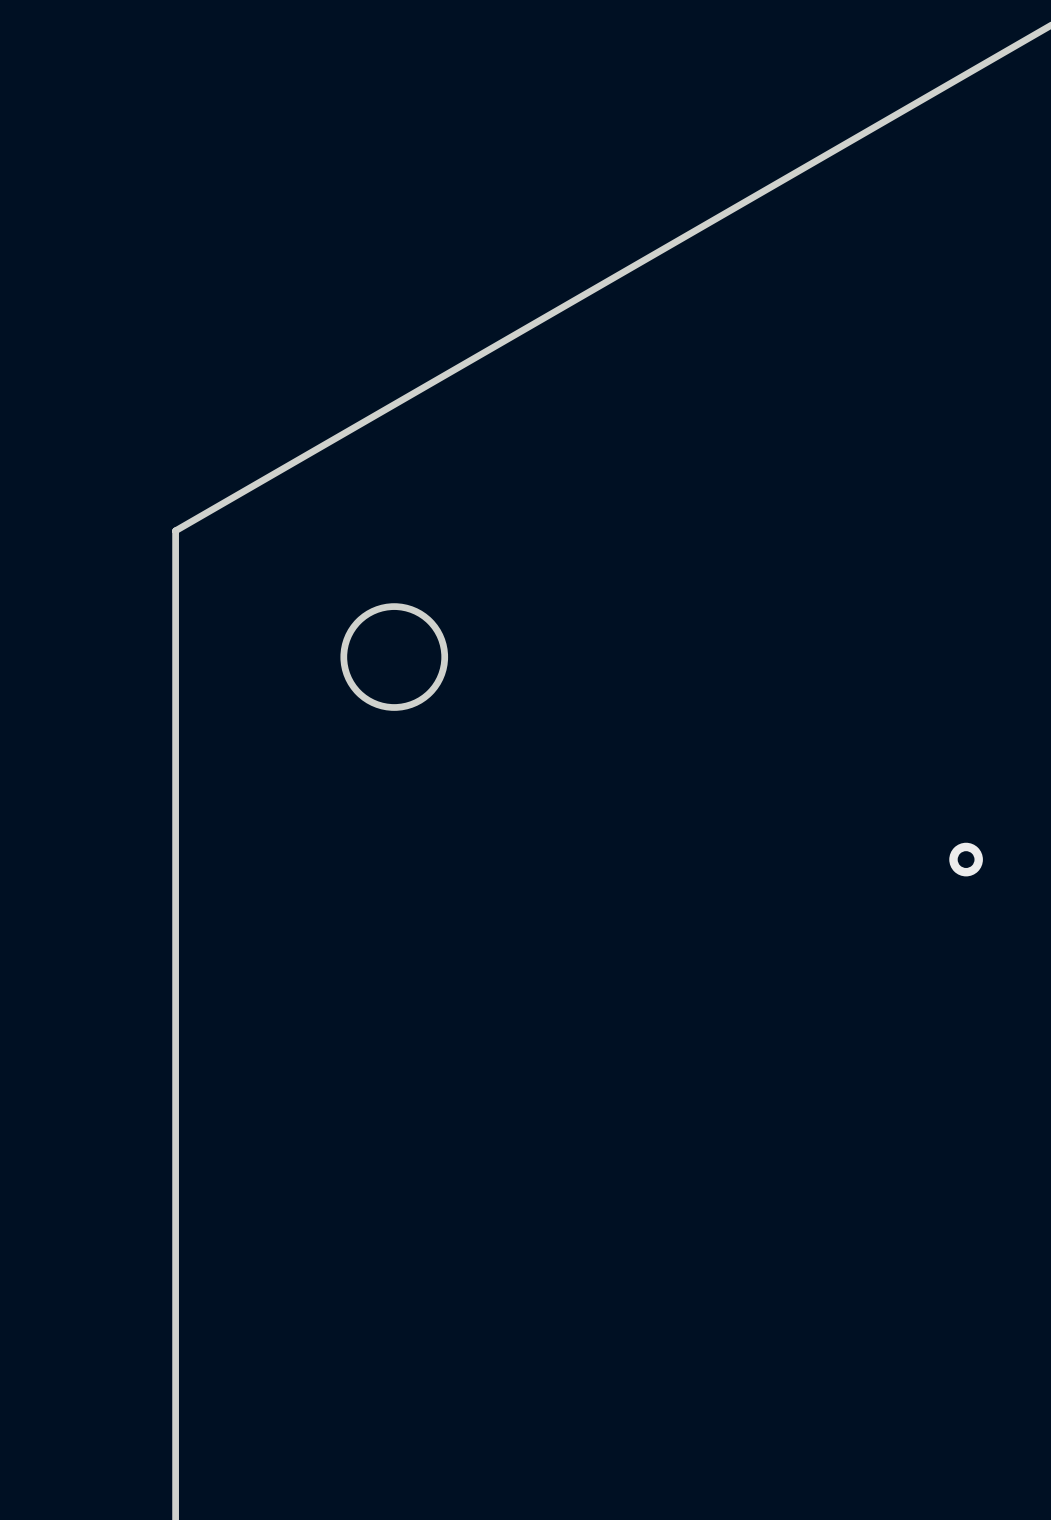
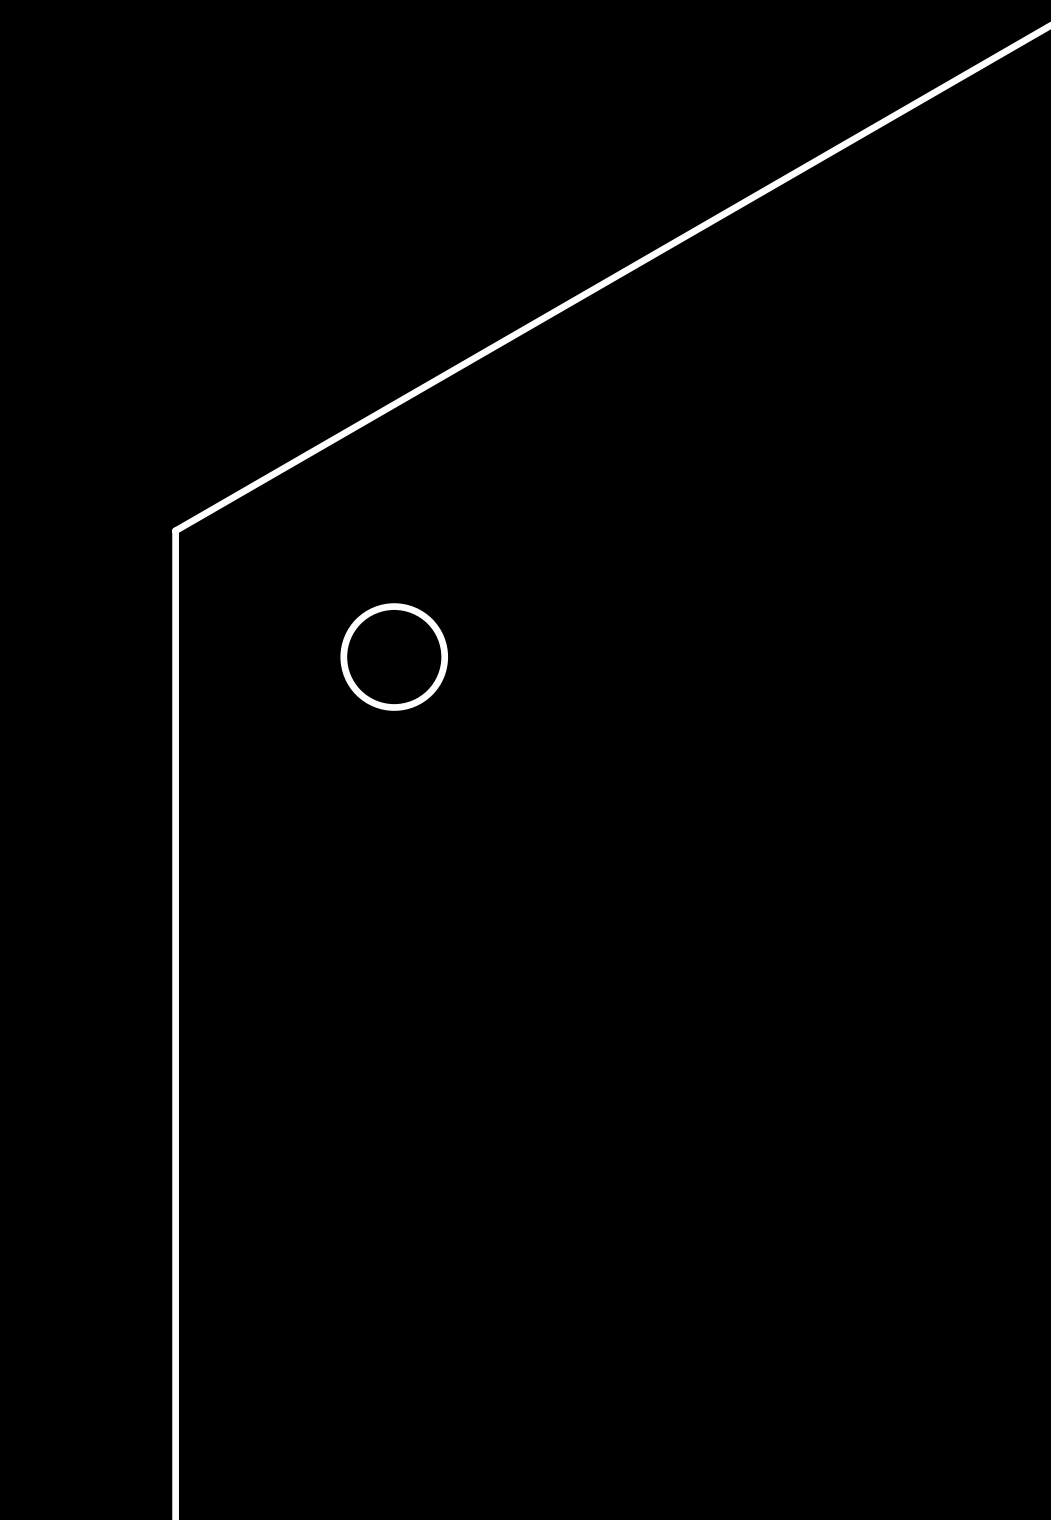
via: (966, 859) -> none

